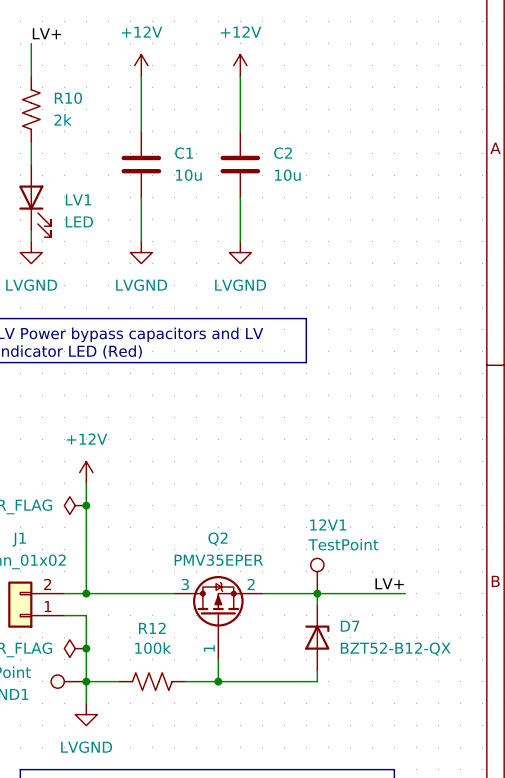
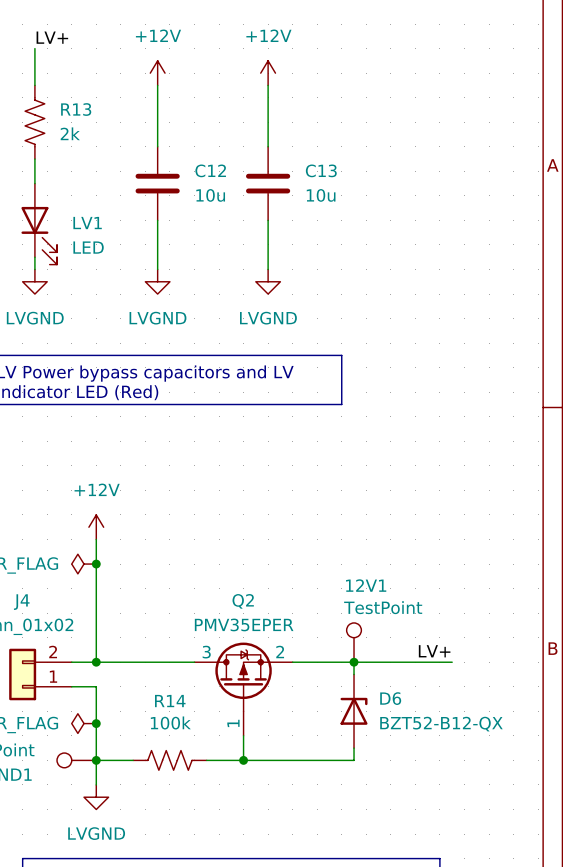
R10 name: R10 (68, 98) -> R13 (76, 109)
C1 name: C1 (184, 153) -> C12 (210, 170)
C2 name: C2 (283, 153) -> C13 (321, 170)
J1 name: J1 (19, 539) -> J4 (21, 602)
D7 name: D7 (350, 626) -> D6 (390, 698)
R12 name: R12 (152, 628) -> R14 (170, 701)

